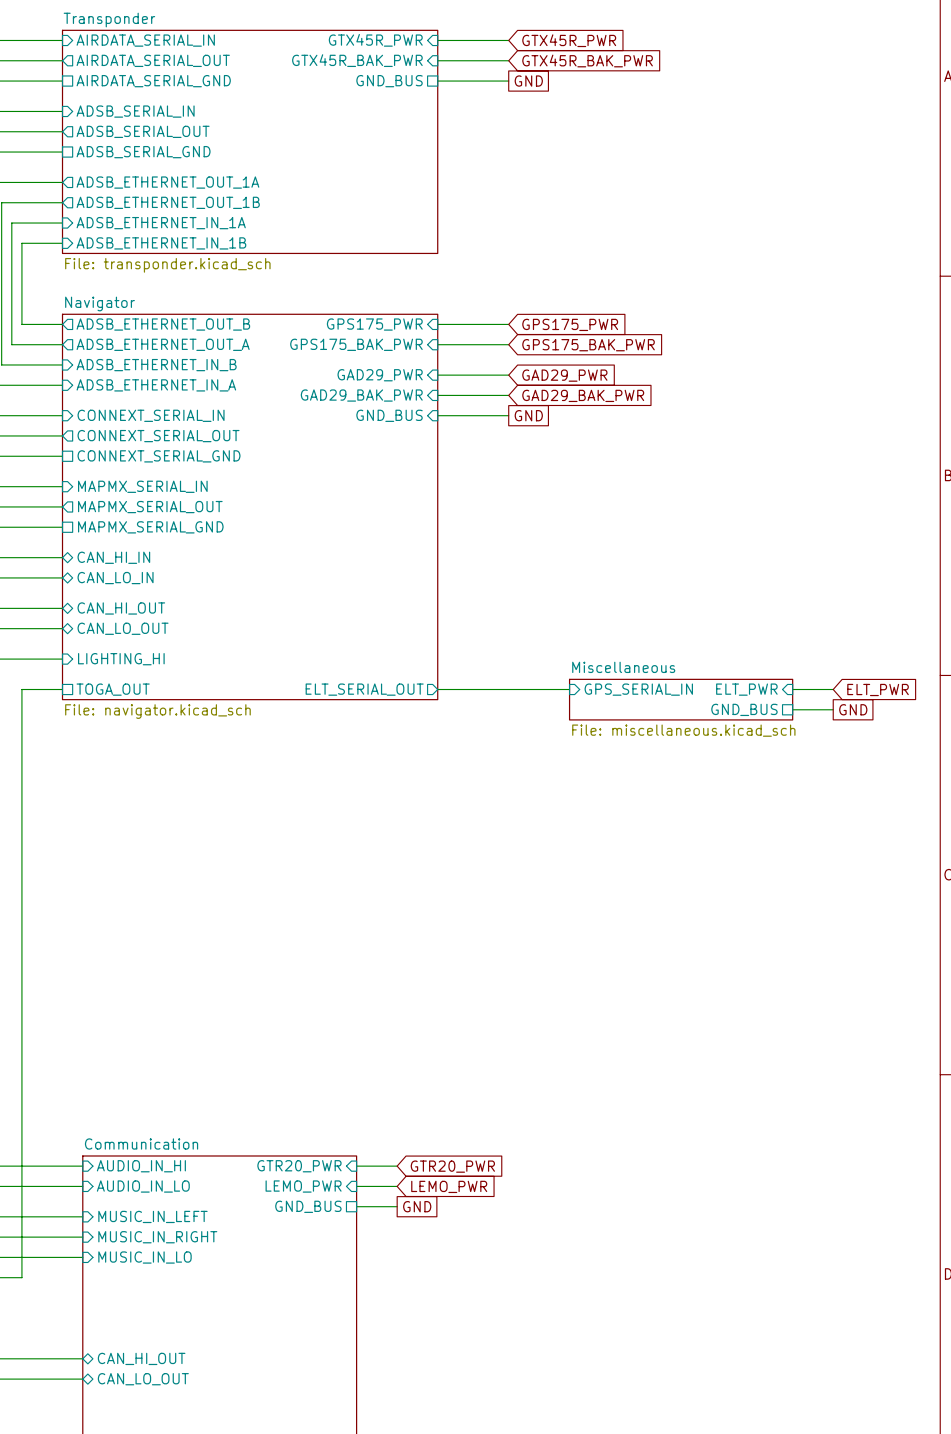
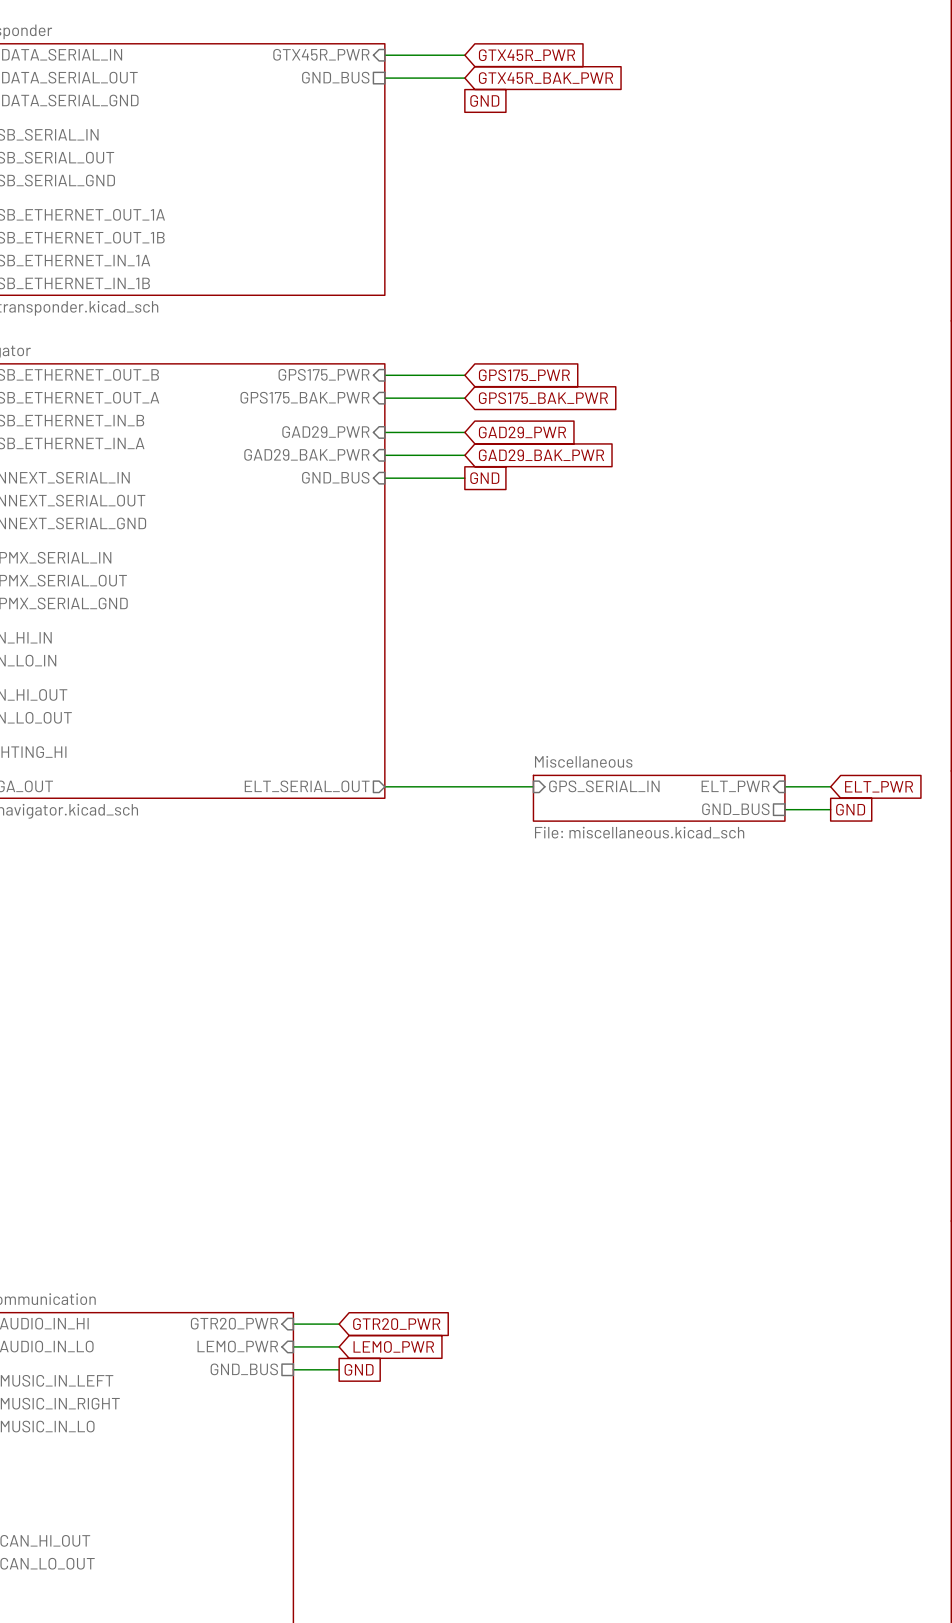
sheet pin shape: input (357, 60) -> passive (335, 77)
sheet pin: GTX45R_BAK_PWR (357, 60) -> GND_BUS (335, 77)
sheet pin: GND_BUS (389, 81) -> none
wire: (437, 81) (508, 81) -> none

